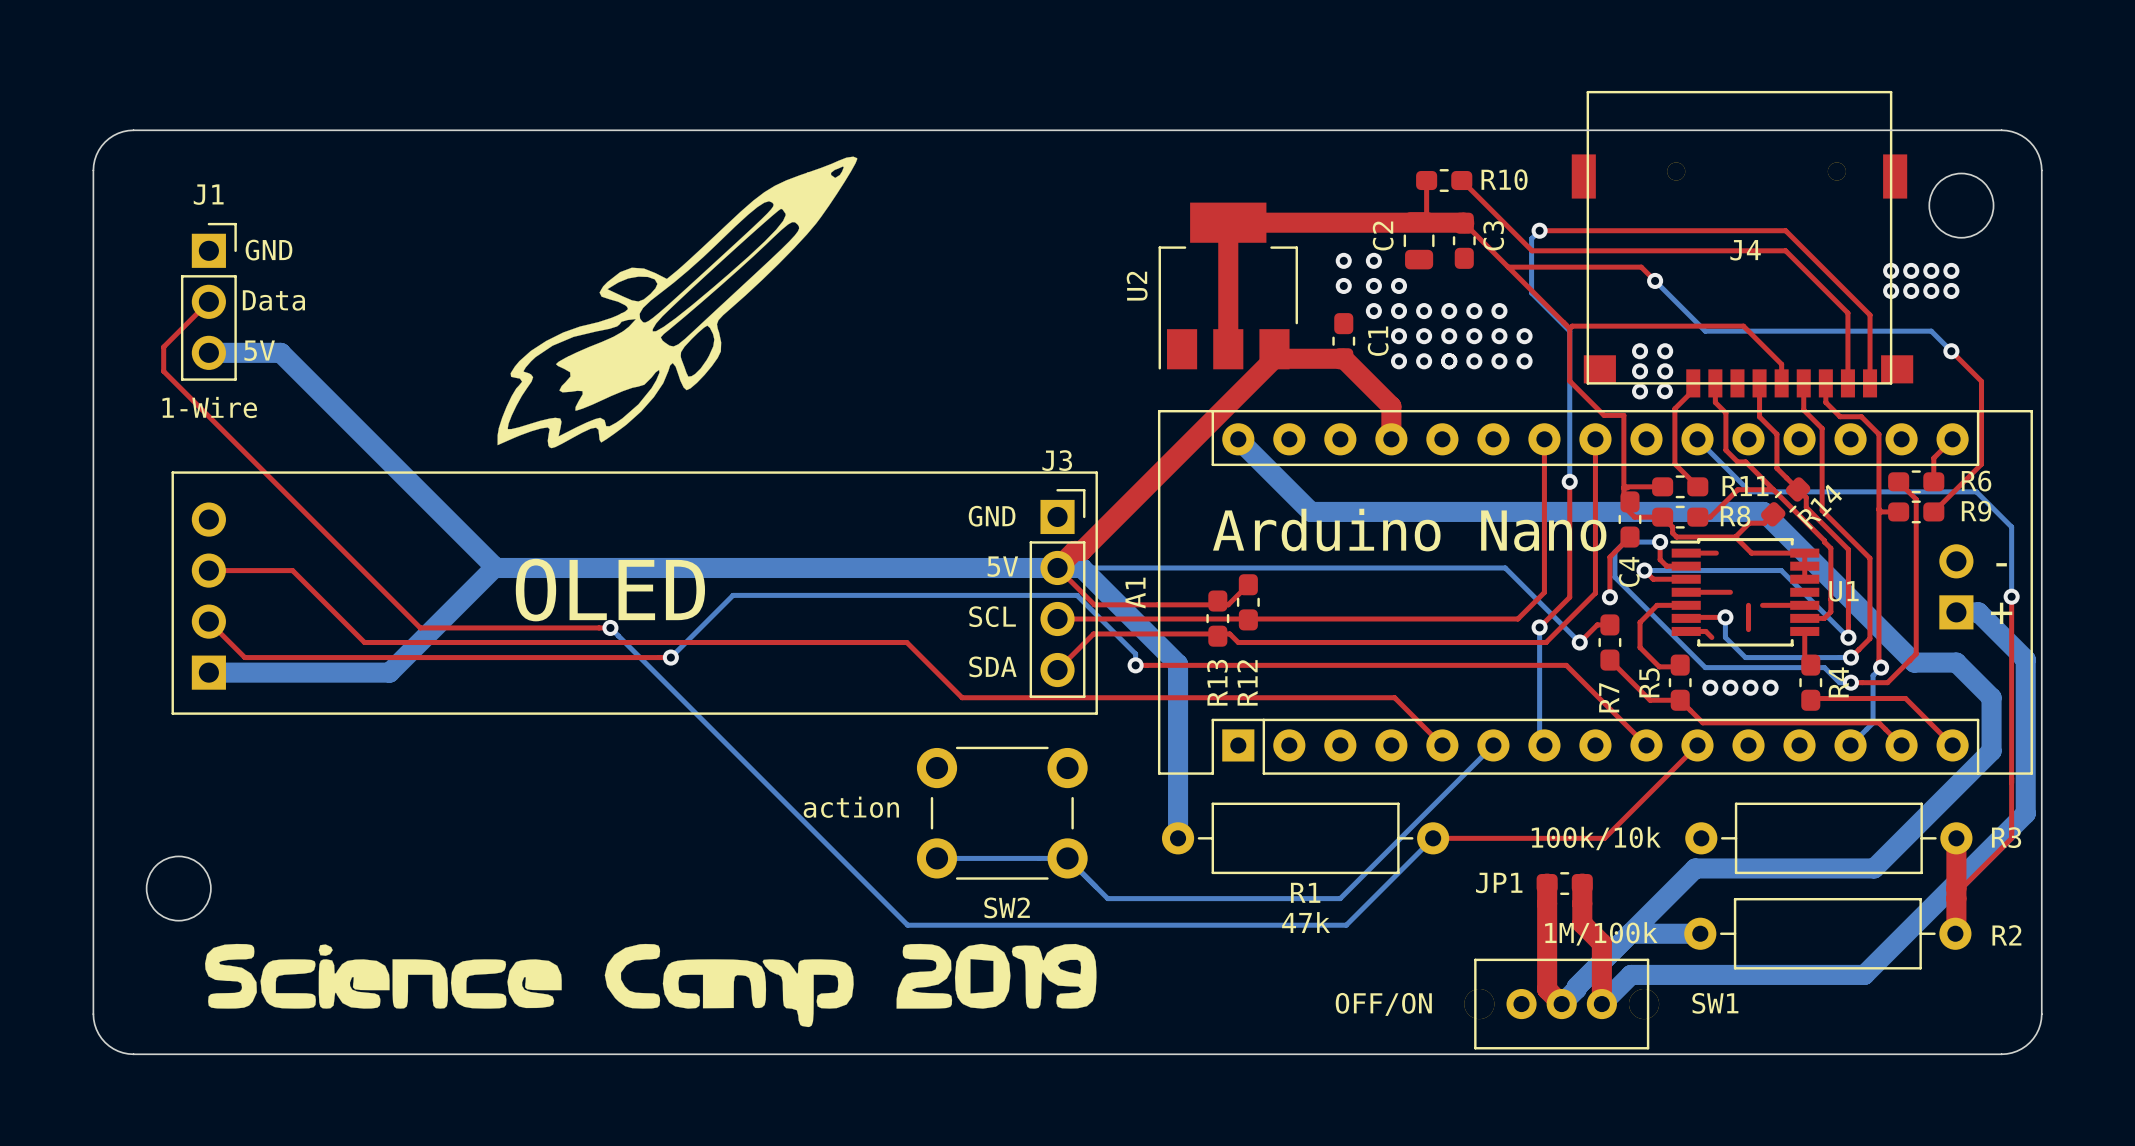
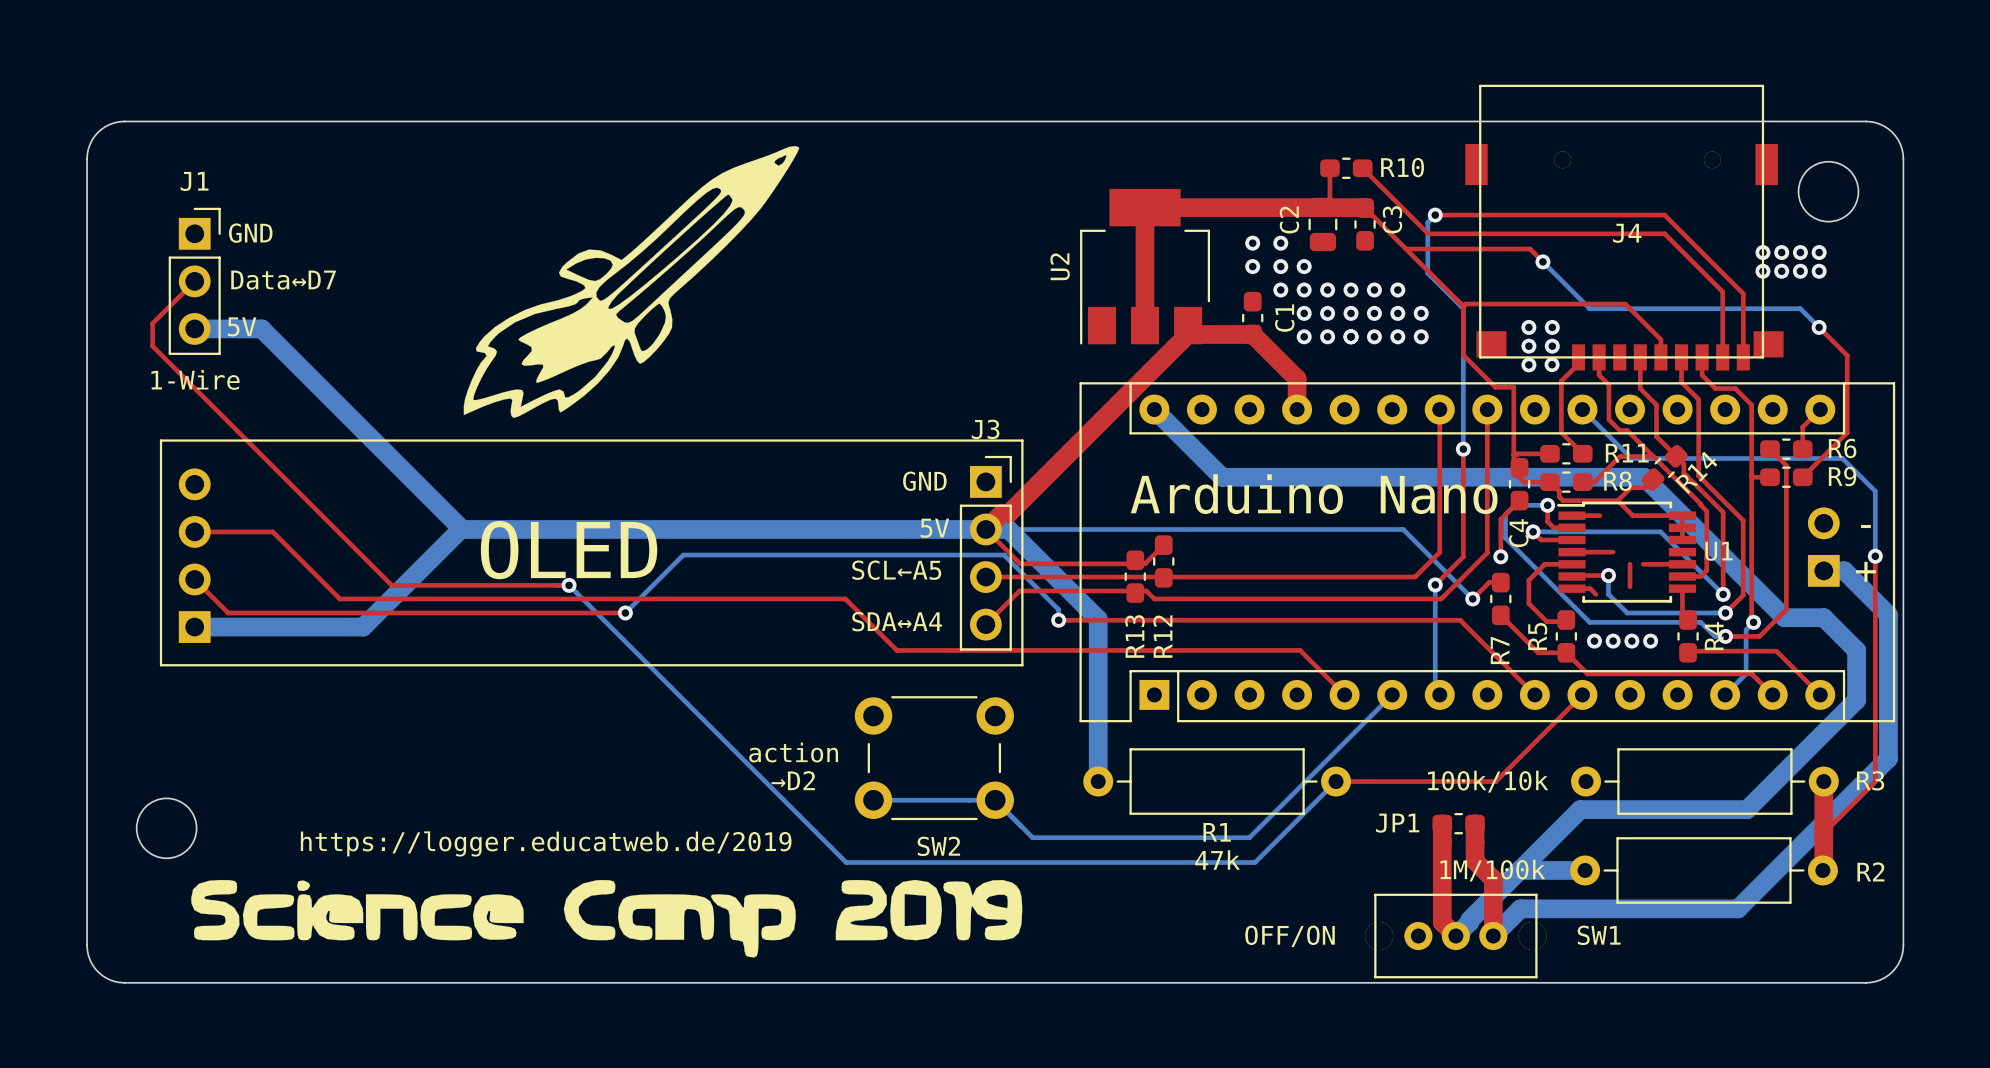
text: Data (273, 300) -> Data↔D7 (283, 280)
A1 name: A1 (1135, 593) -> none
text: SCL (992, 616) -> SCL←A5 (896, 570)
text: SDA (992, 666) -> SDA↔A4 (897, 621)
text: none -> →D2 (793, 780)
text: none -> https://logger.educatweb.de/2019 (546, 843)

